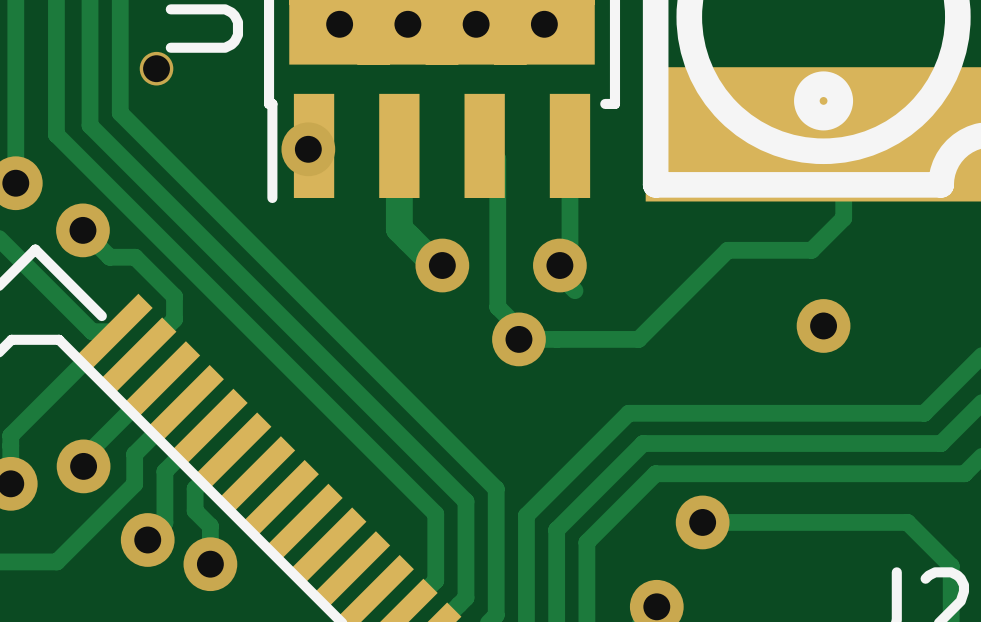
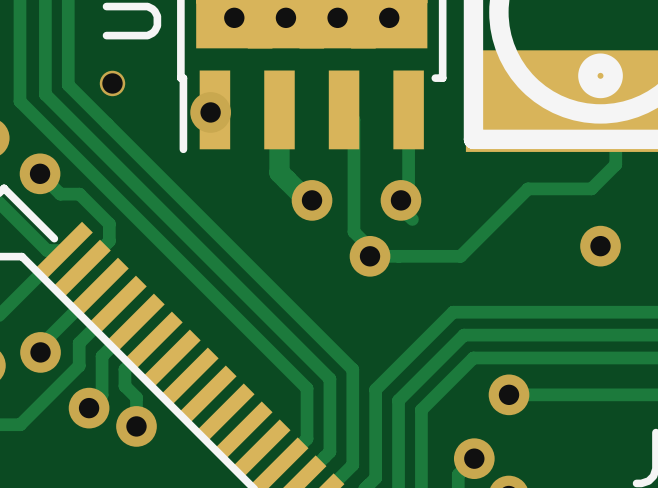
via position: (156, 68) -> (112, 83)

